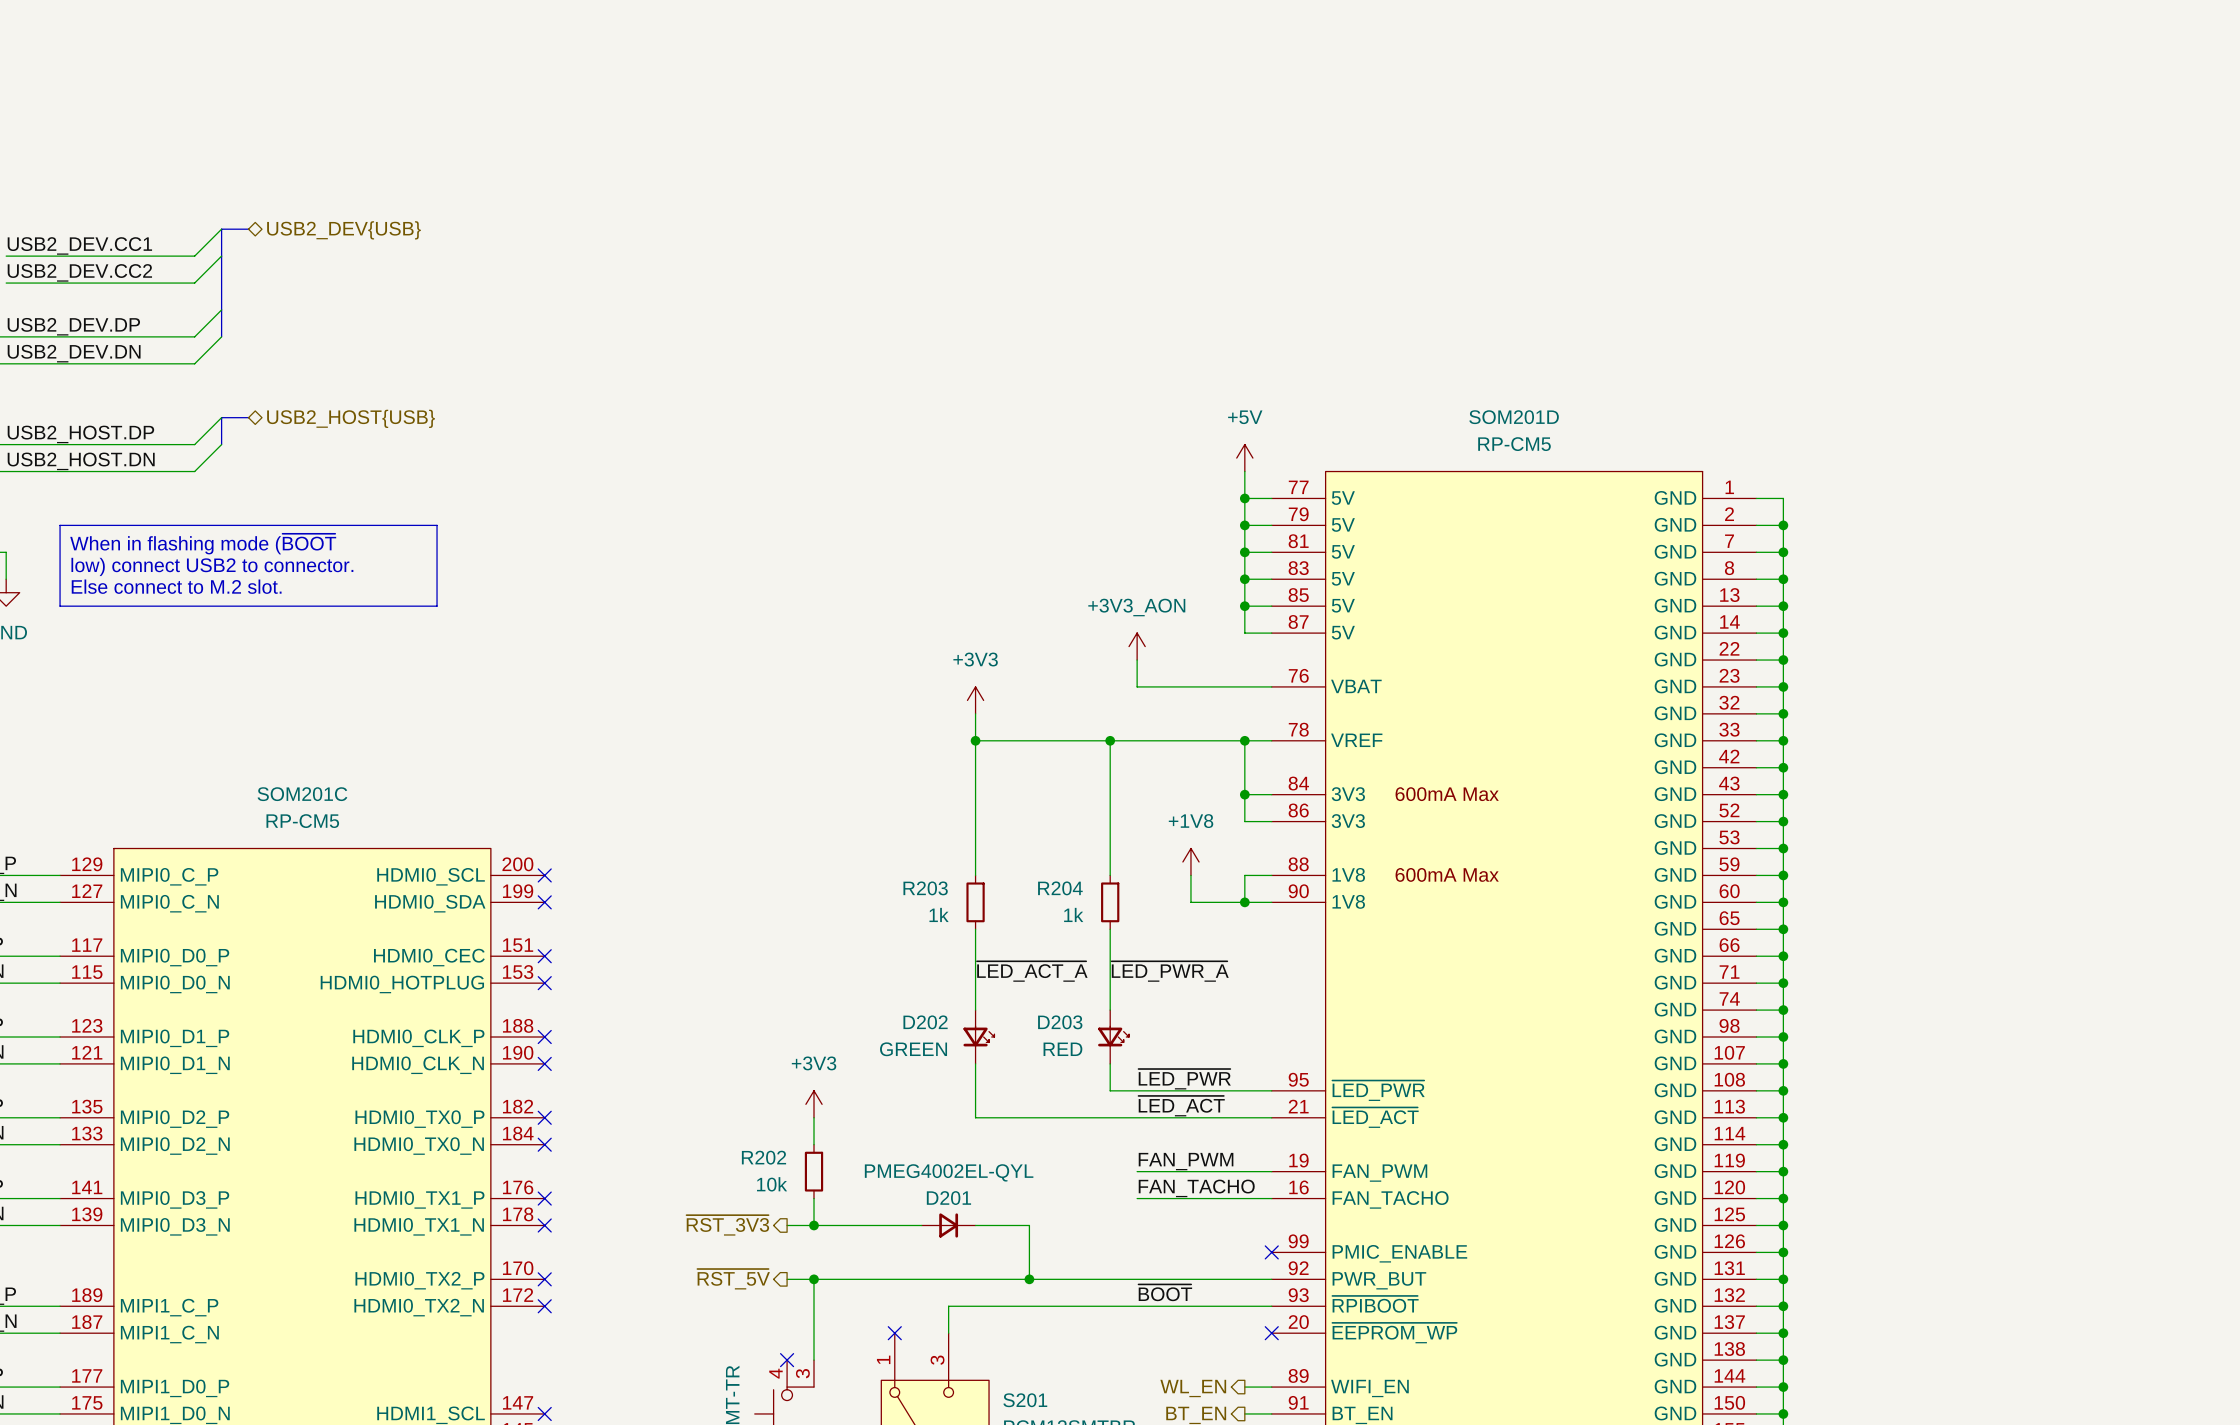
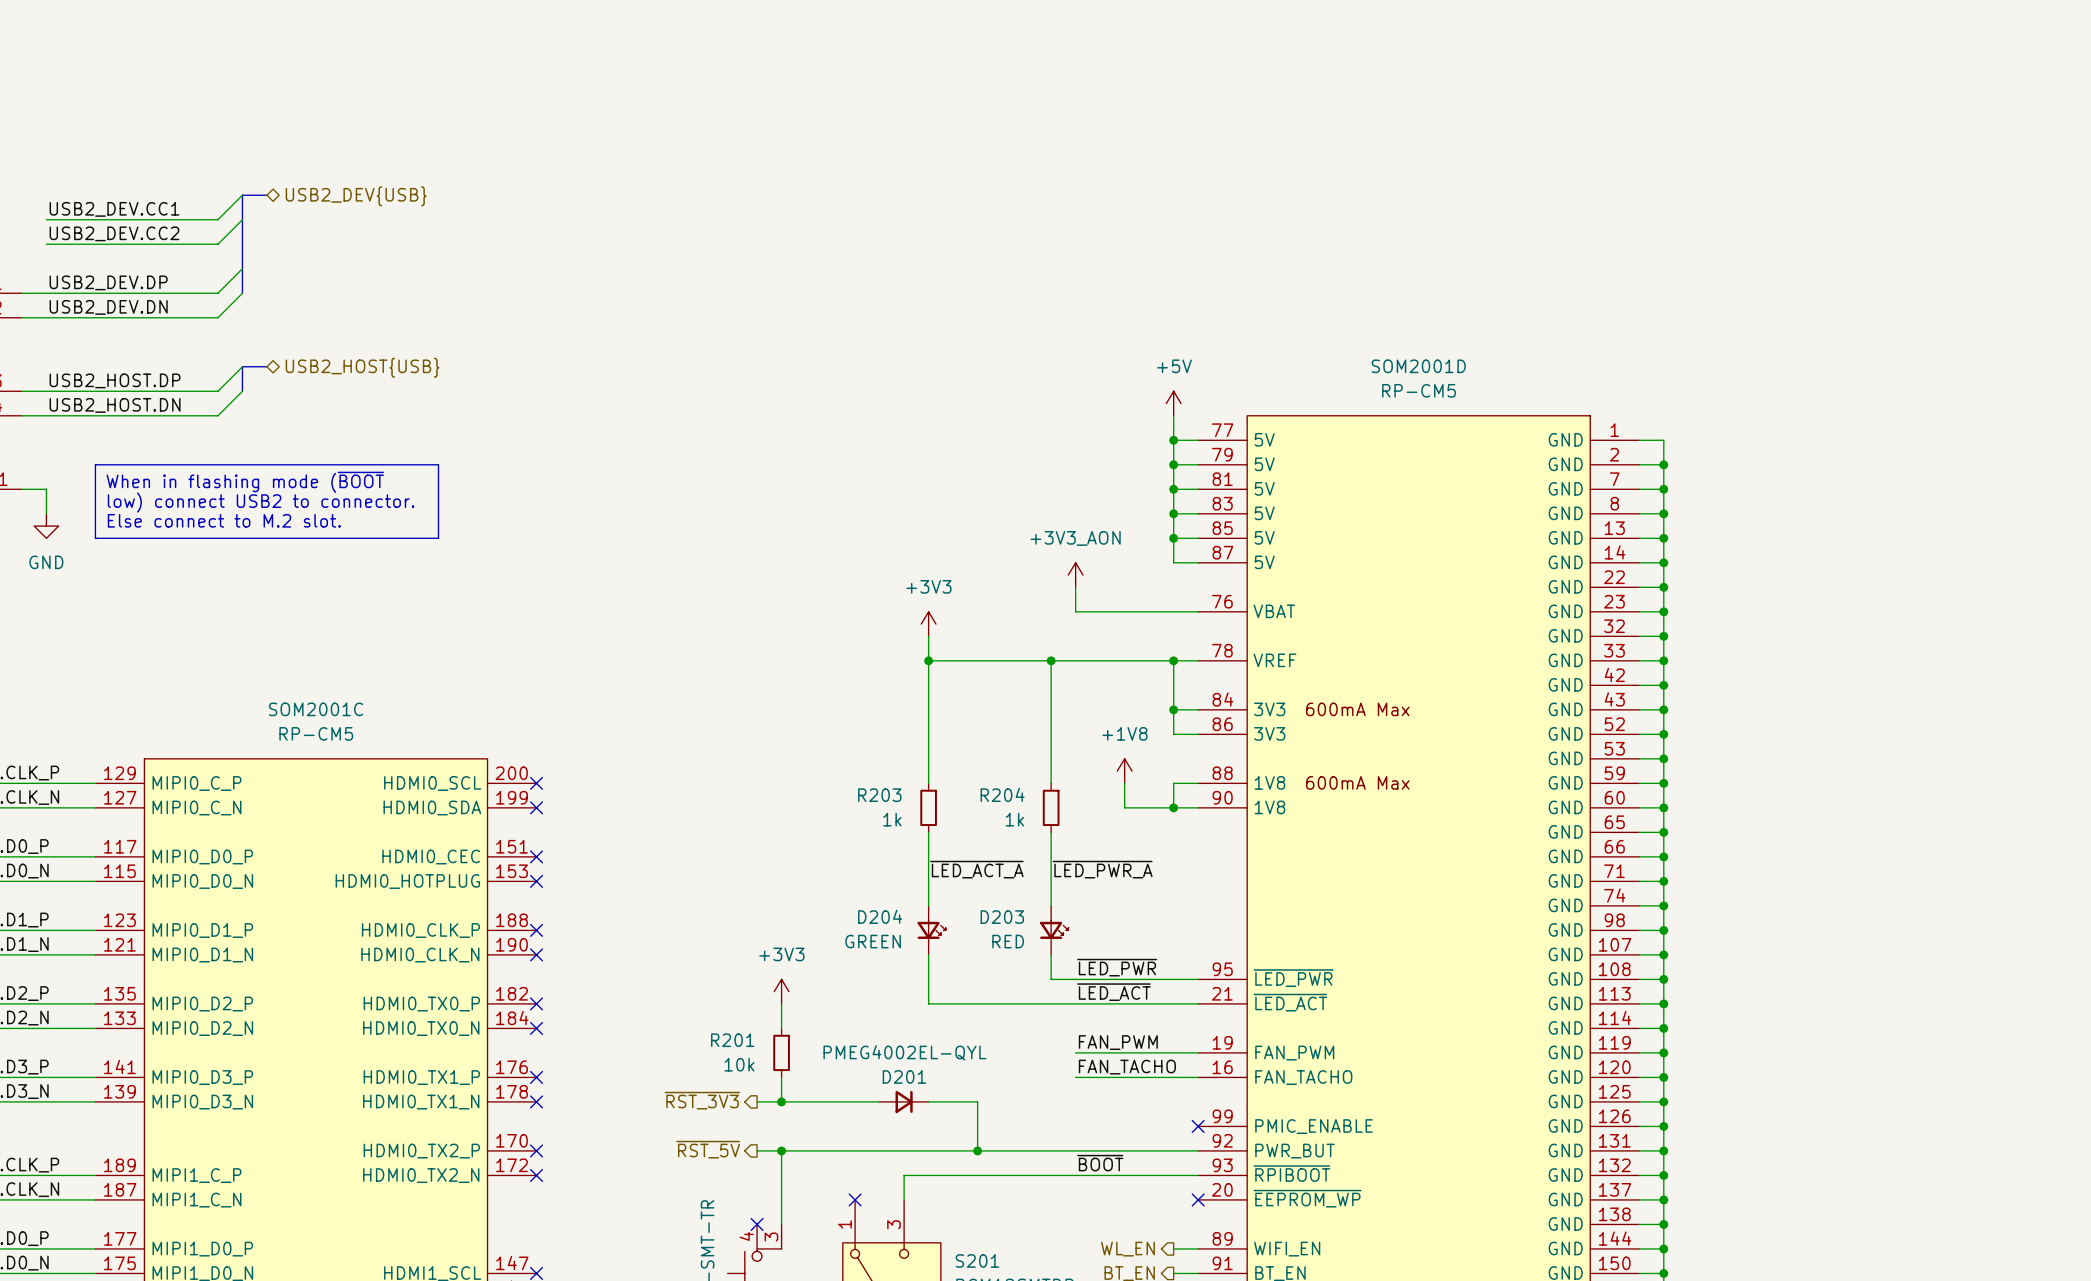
SOM201D name: SOM201D (1514, 417) -> SOM2001D (1418, 366)
SOM201C name: SOM201C (302, 794) -> SOM2001C (315, 709)
D202 name: D202 (925, 1022) -> D204 (880, 916)
R202 name: R202 (763, 1157) -> R201 (732, 1040)

